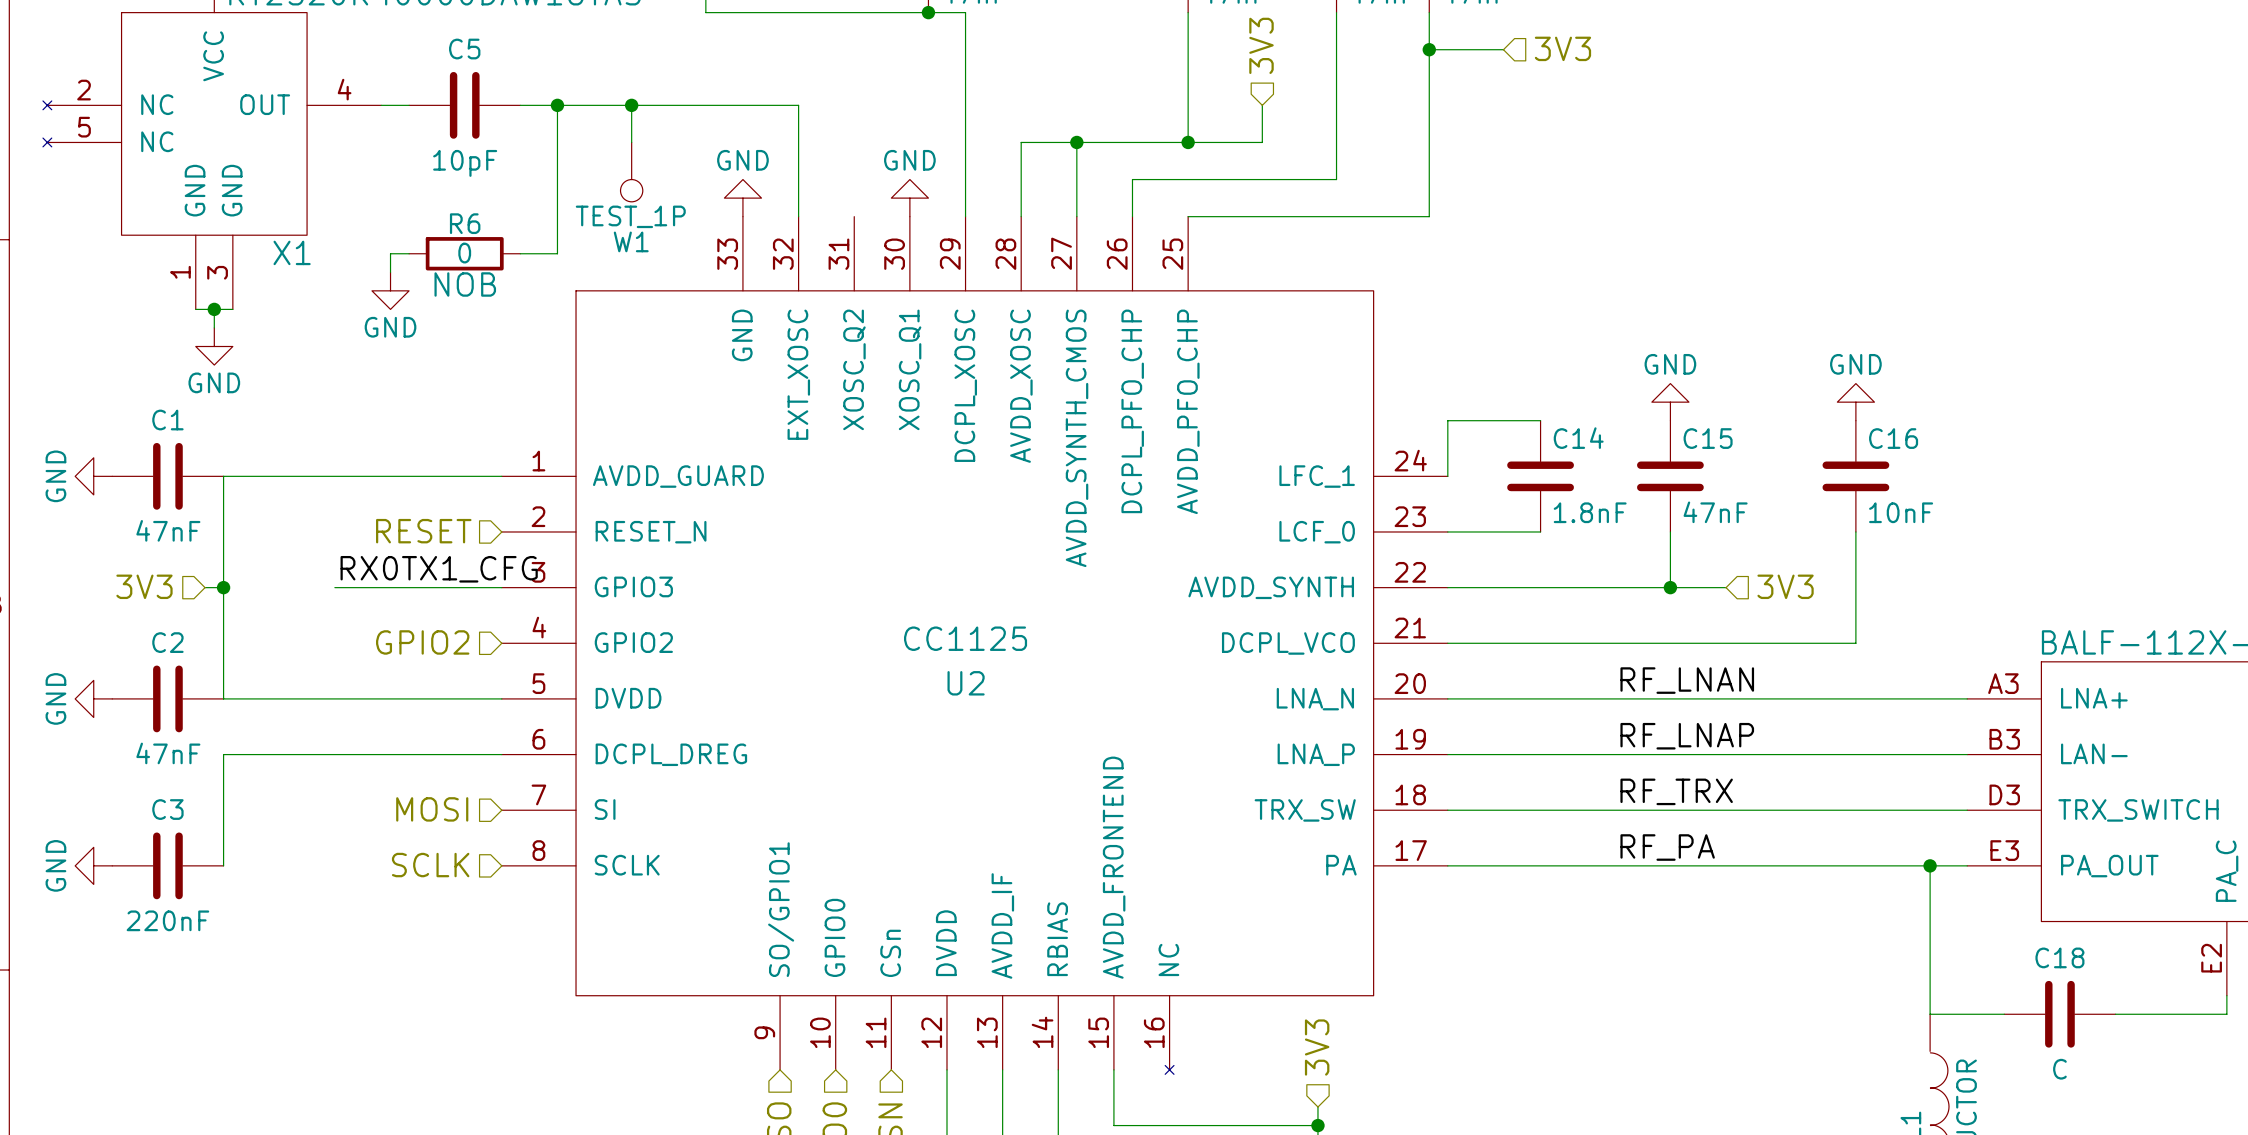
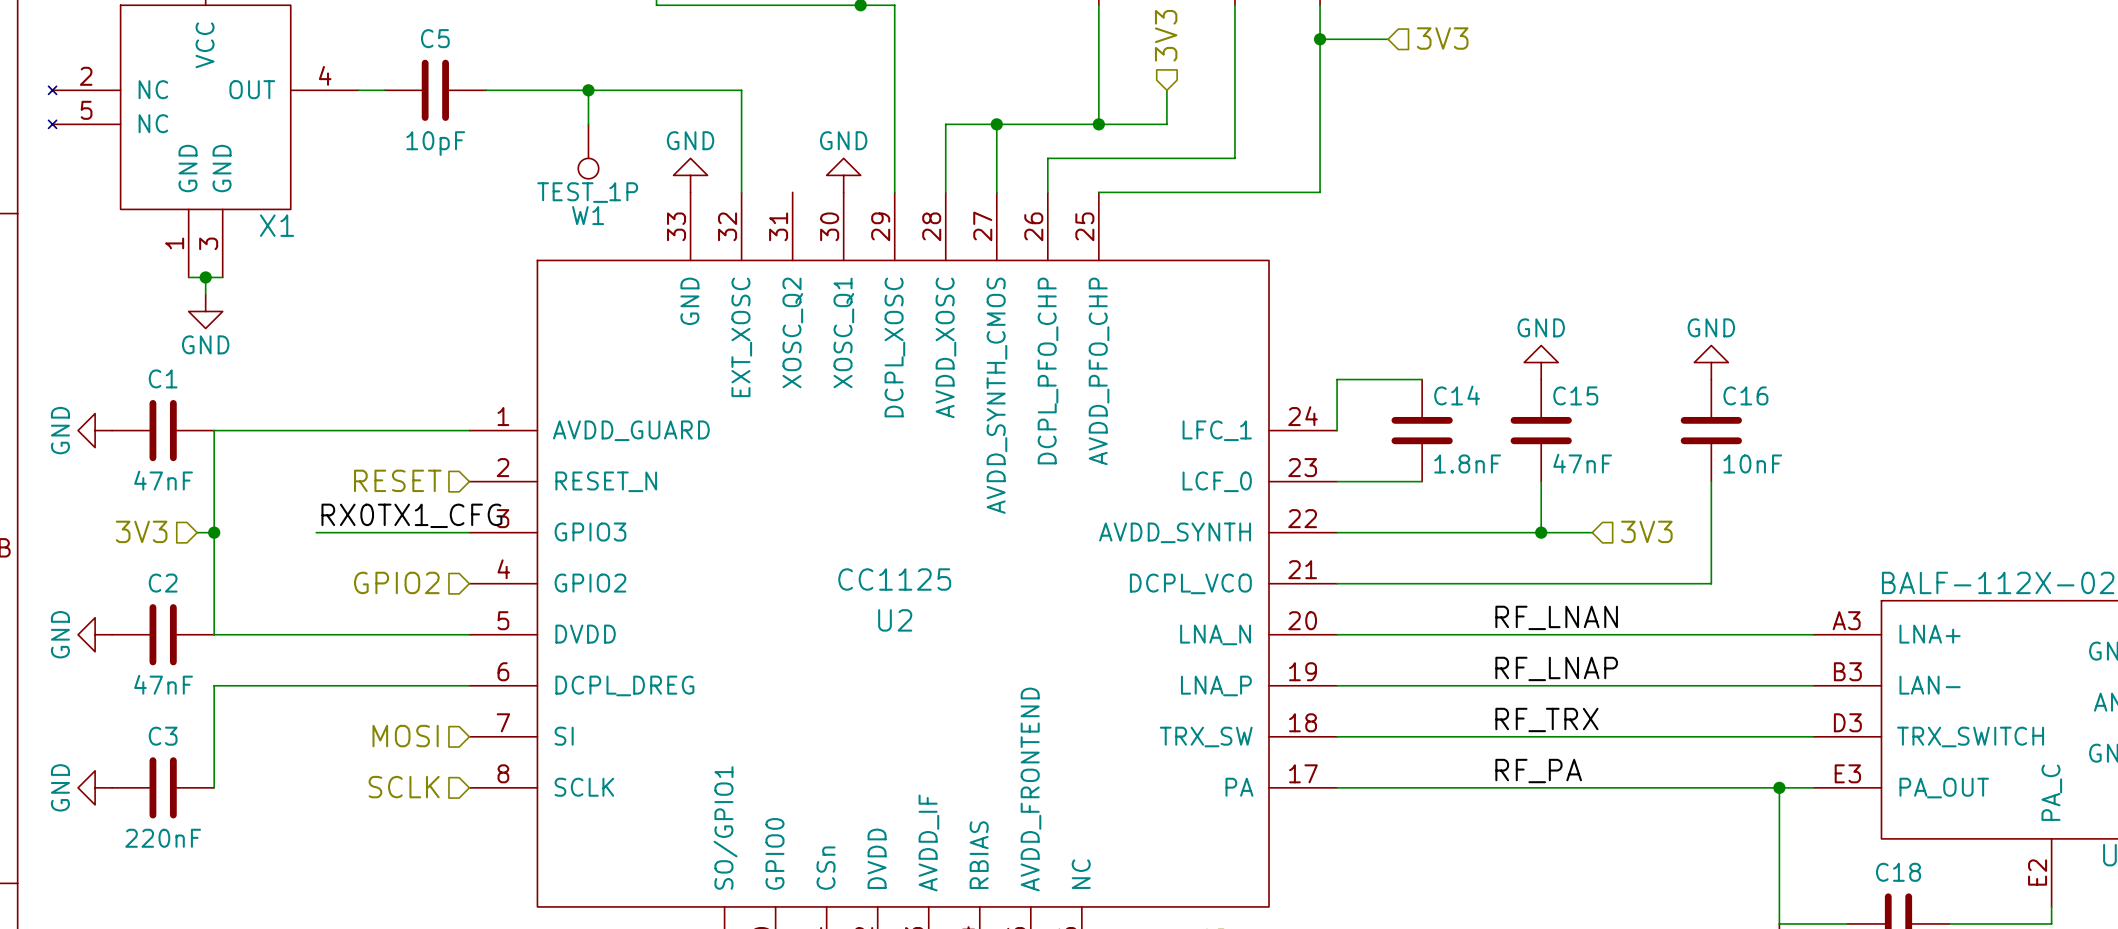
wire: (557, 105) (557, 253) (520, 253) -> none
junction: (557, 105) -> none
wire: (409, 253) (390, 253) (390, 272) -> none
R6: 0 (464, 253) -> none
power symbol: GND (390, 290) -> none

